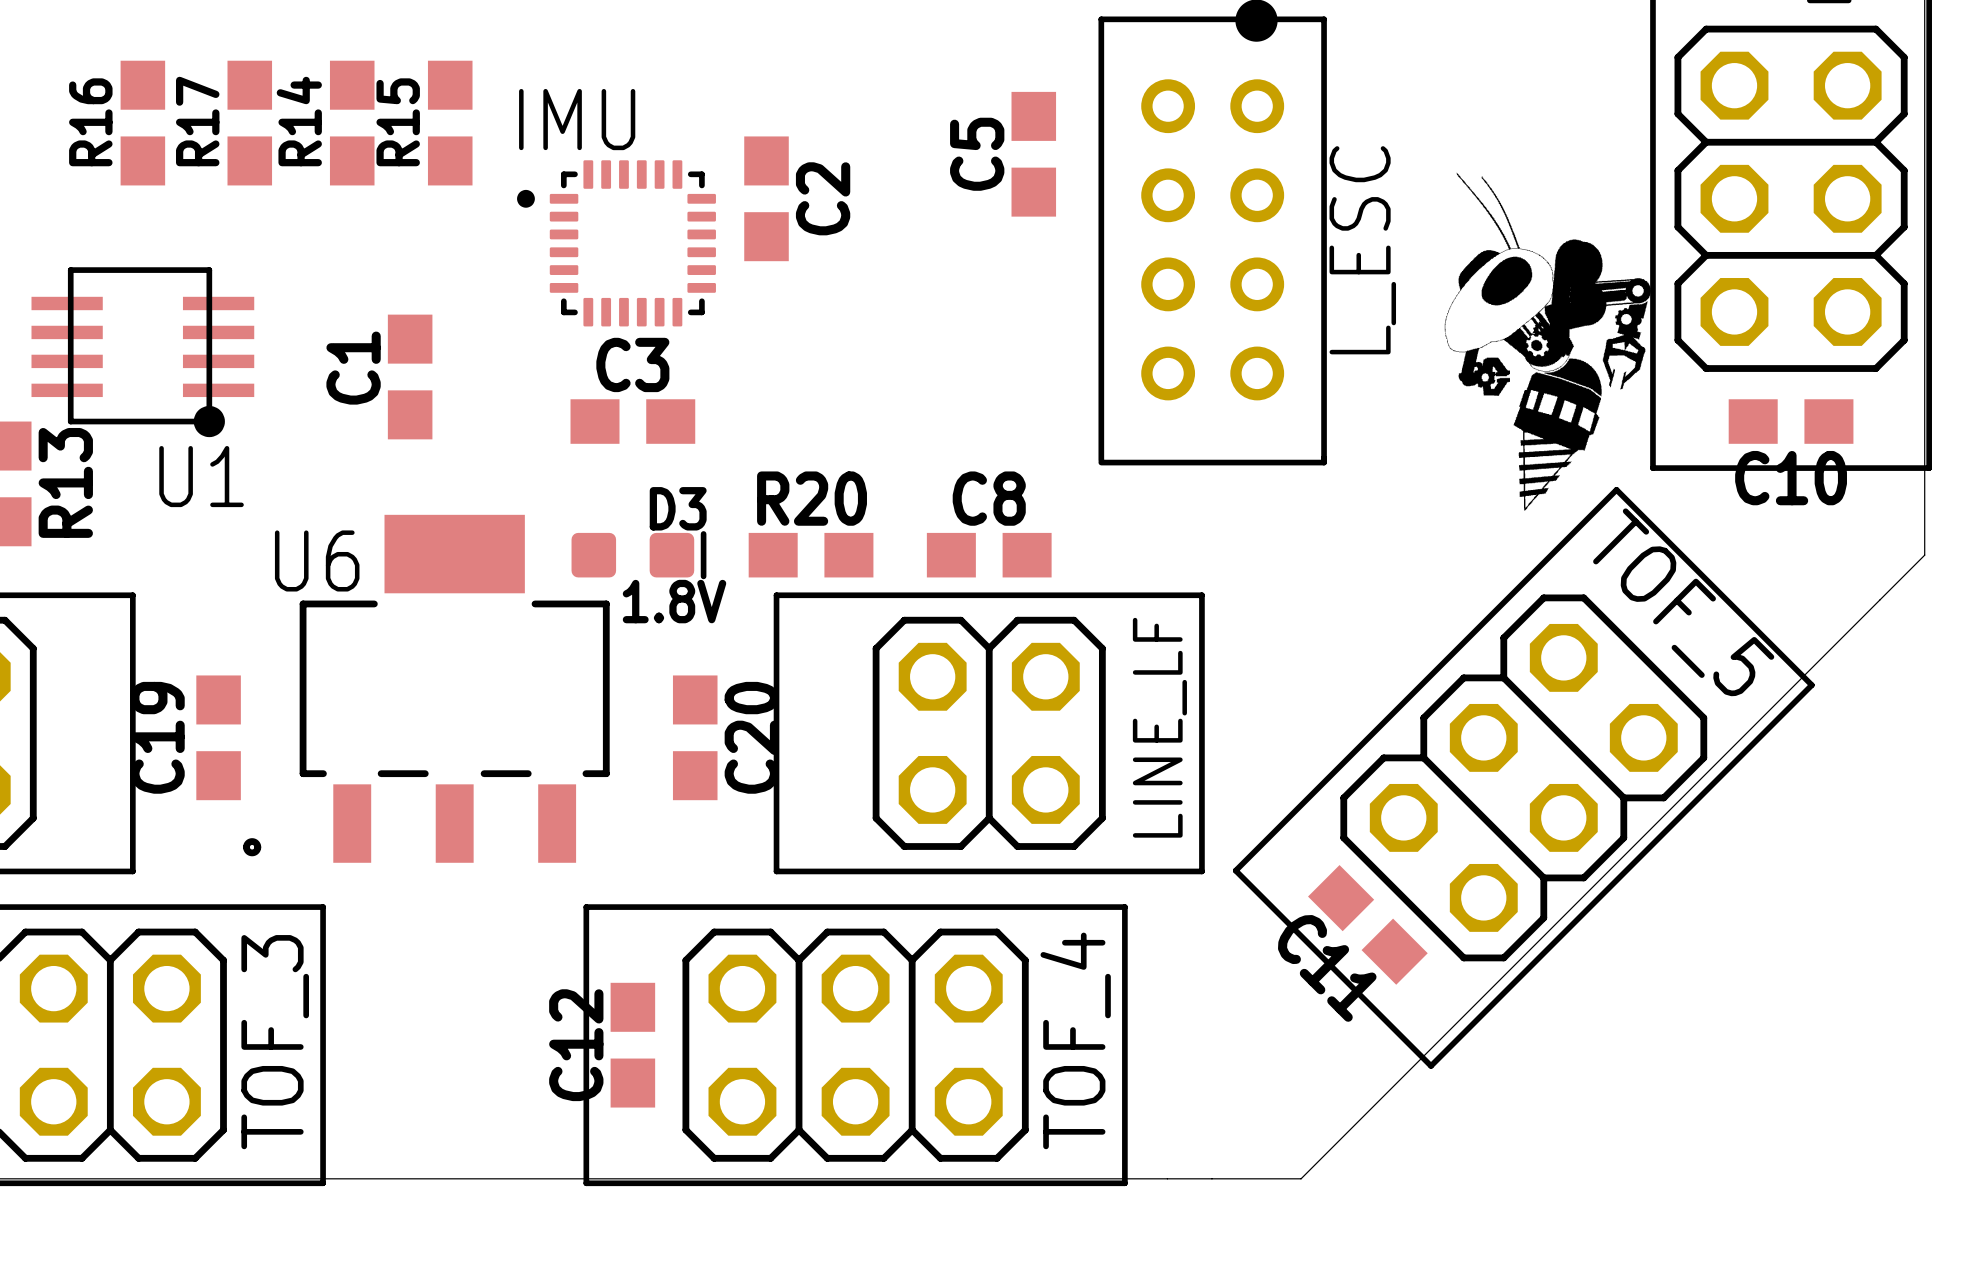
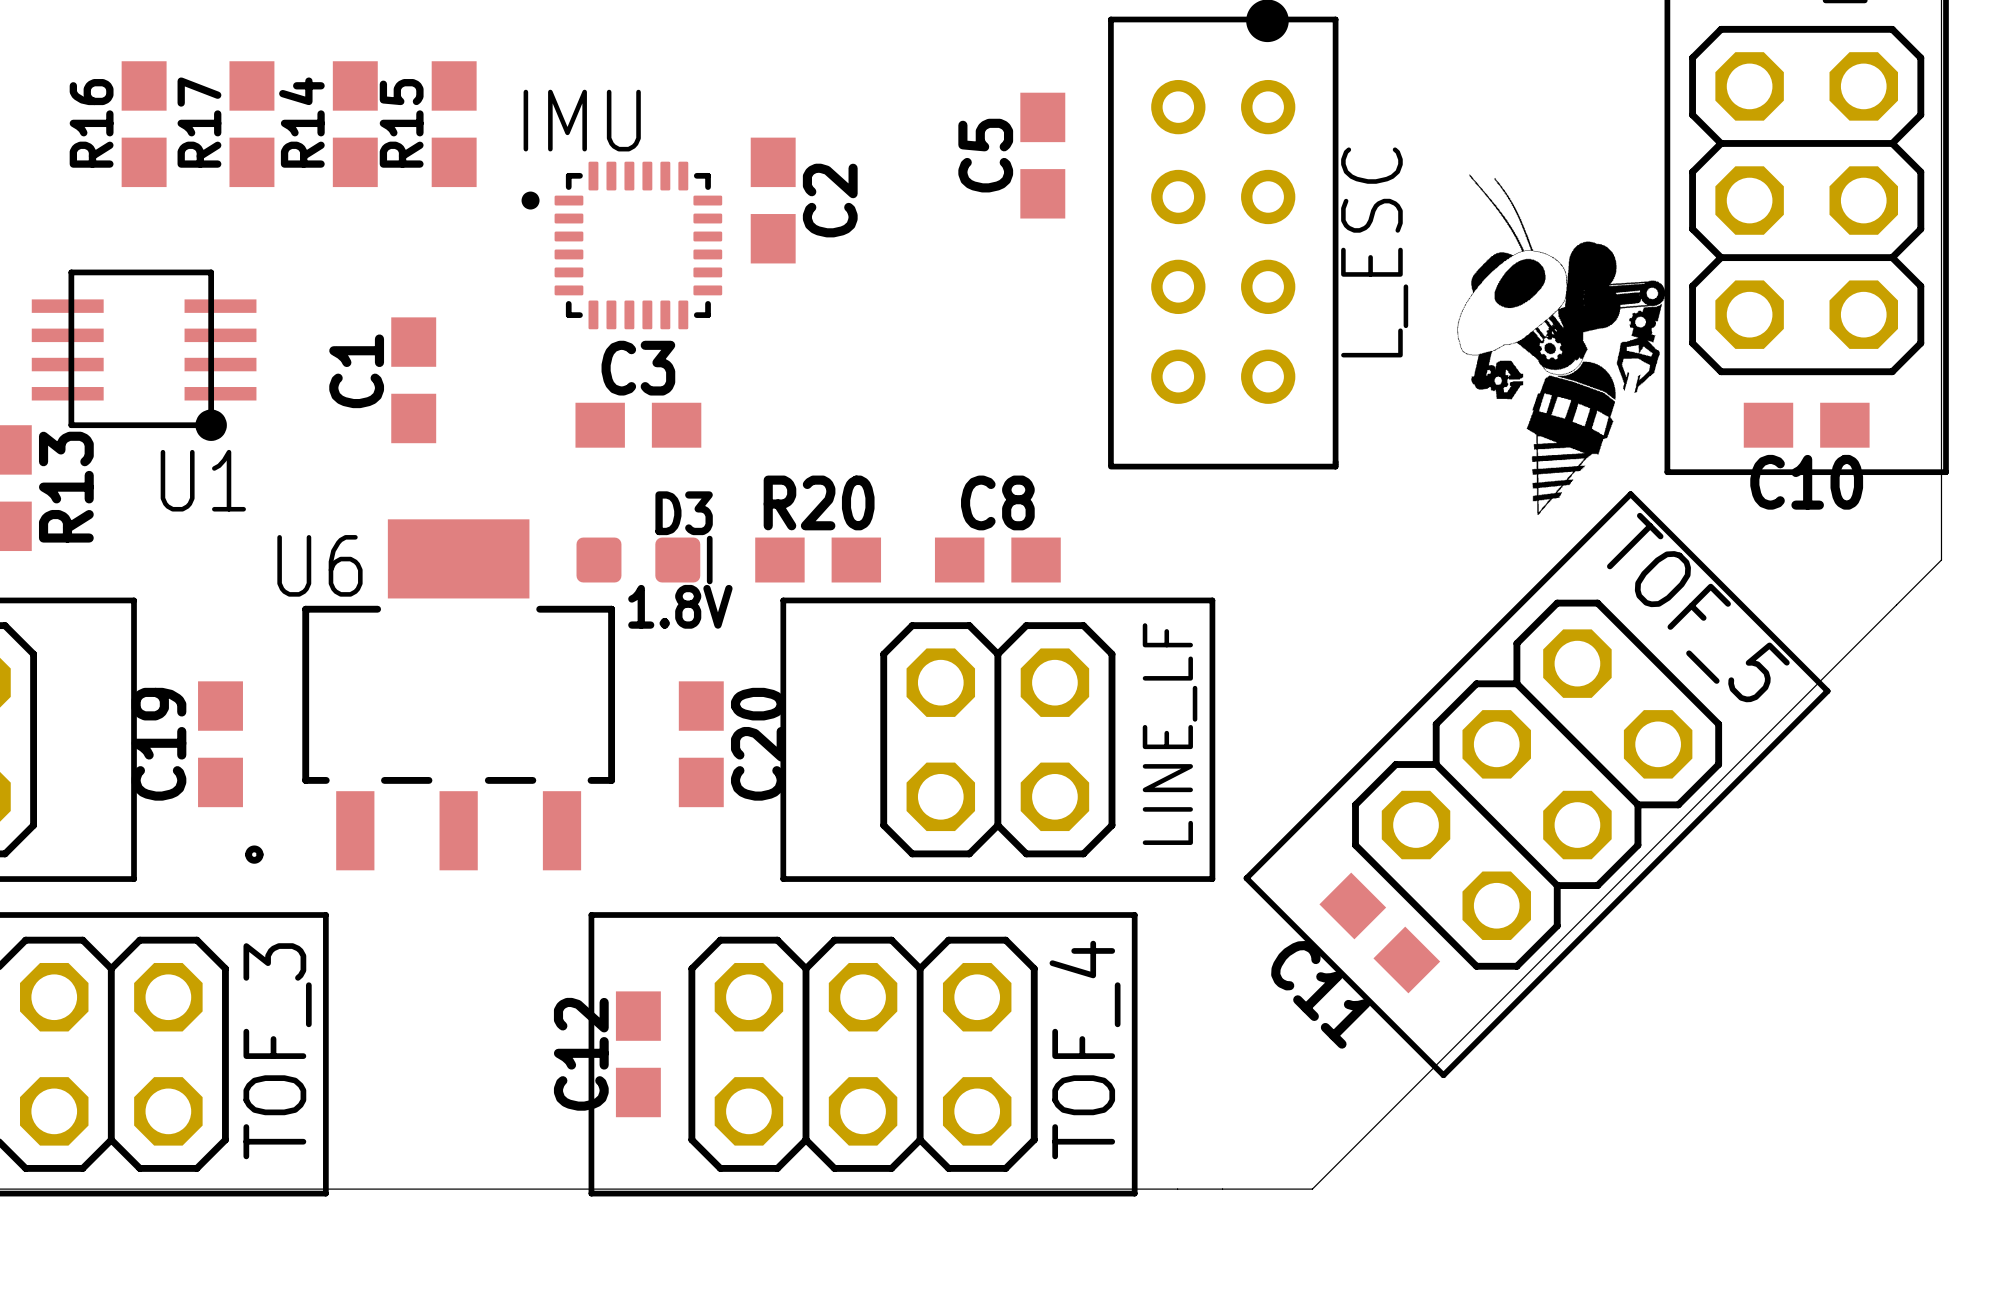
C11 name position: C11 (1327, 968) -> C11 (1320, 994)

